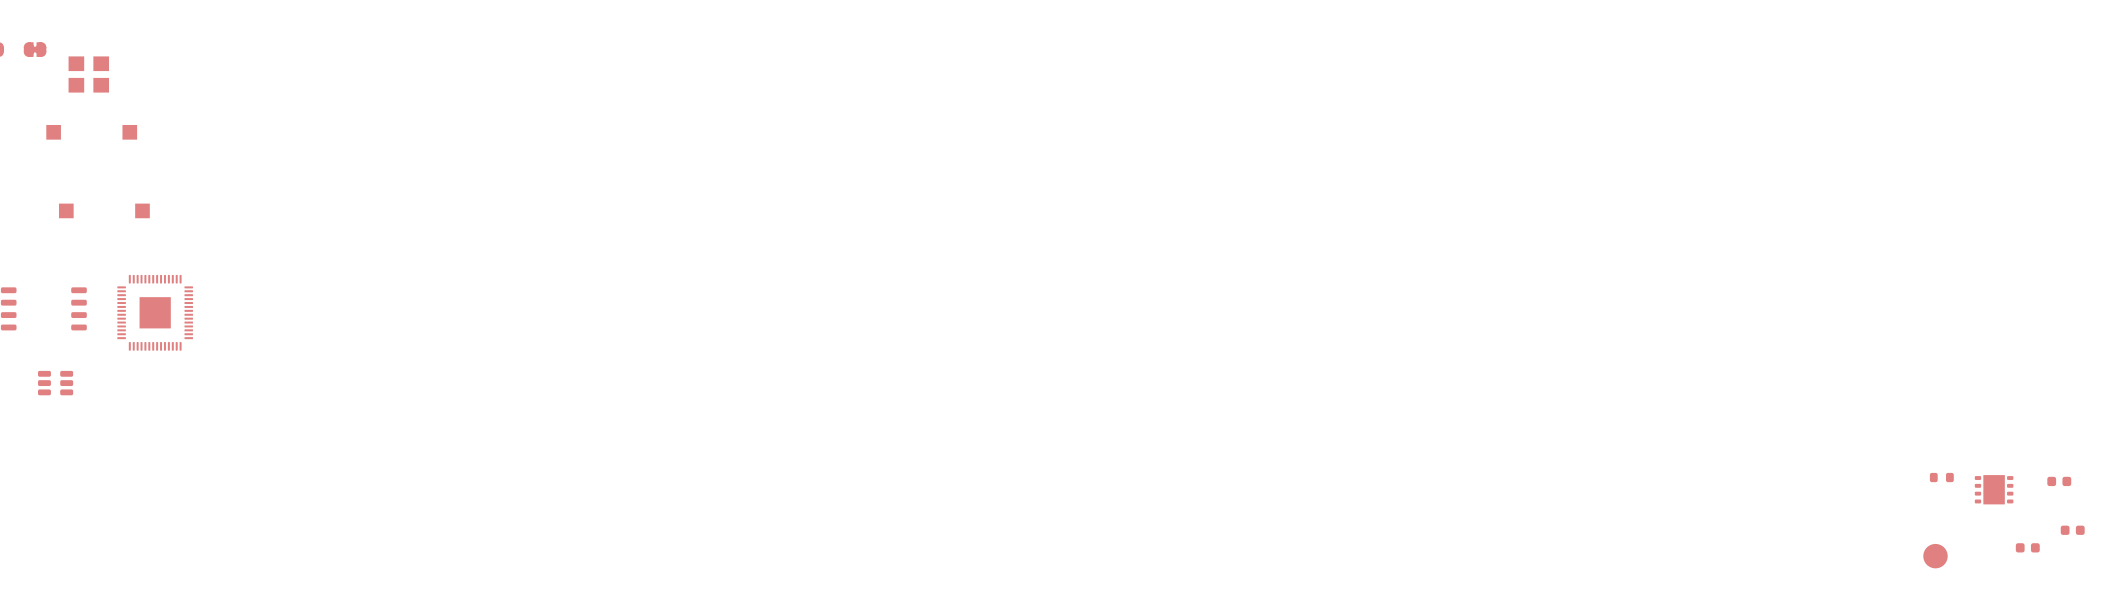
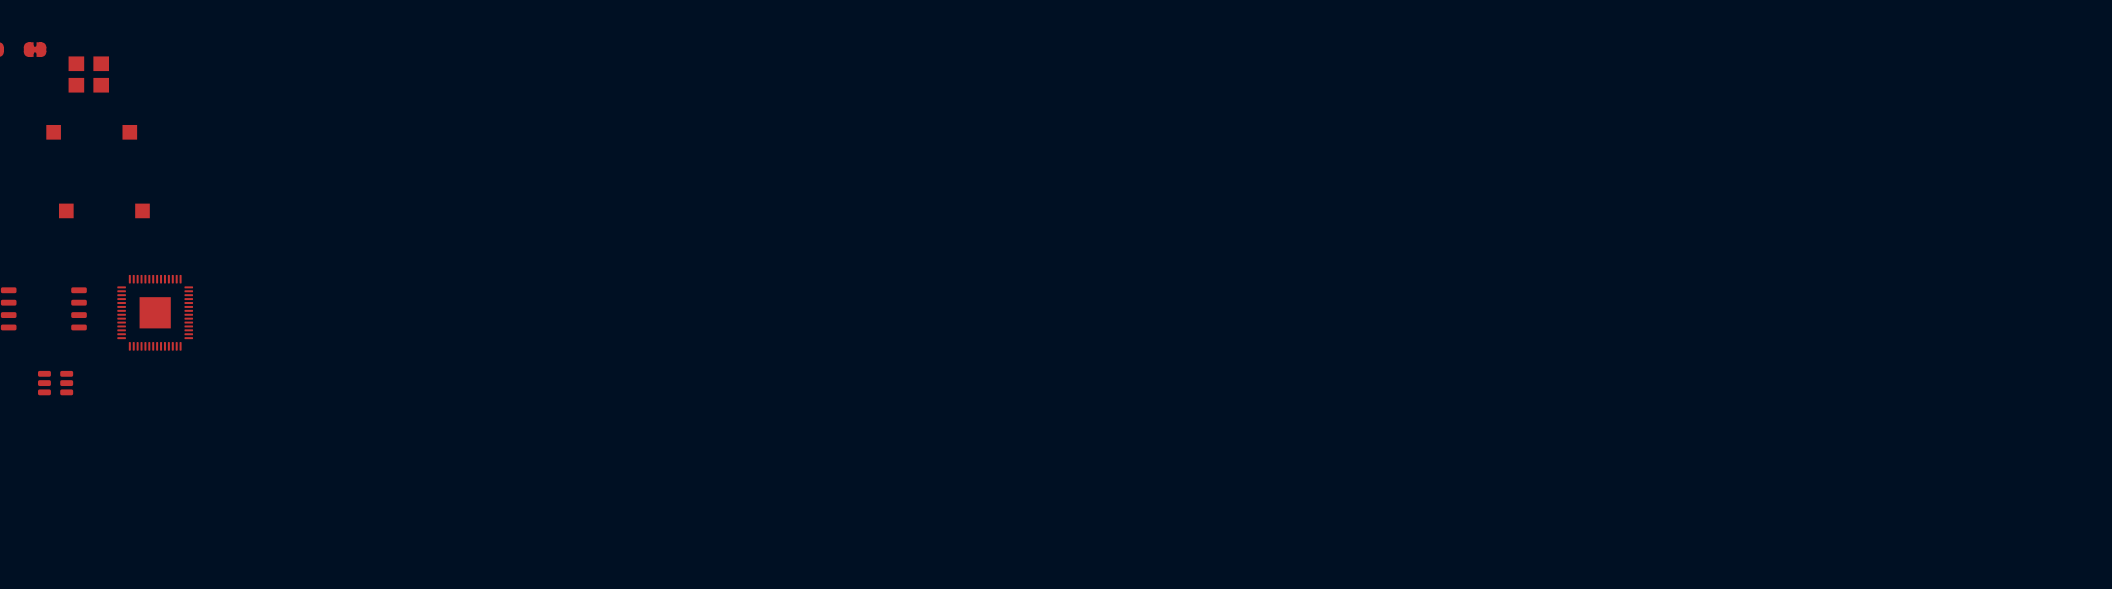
part: (1941, 477) -> none
part: (2059, 481) -> none
part: (1994, 489) -> none
part: (2072, 530) -> none
part: (2027, 547) -> none
part: (1935, 556) -> none

